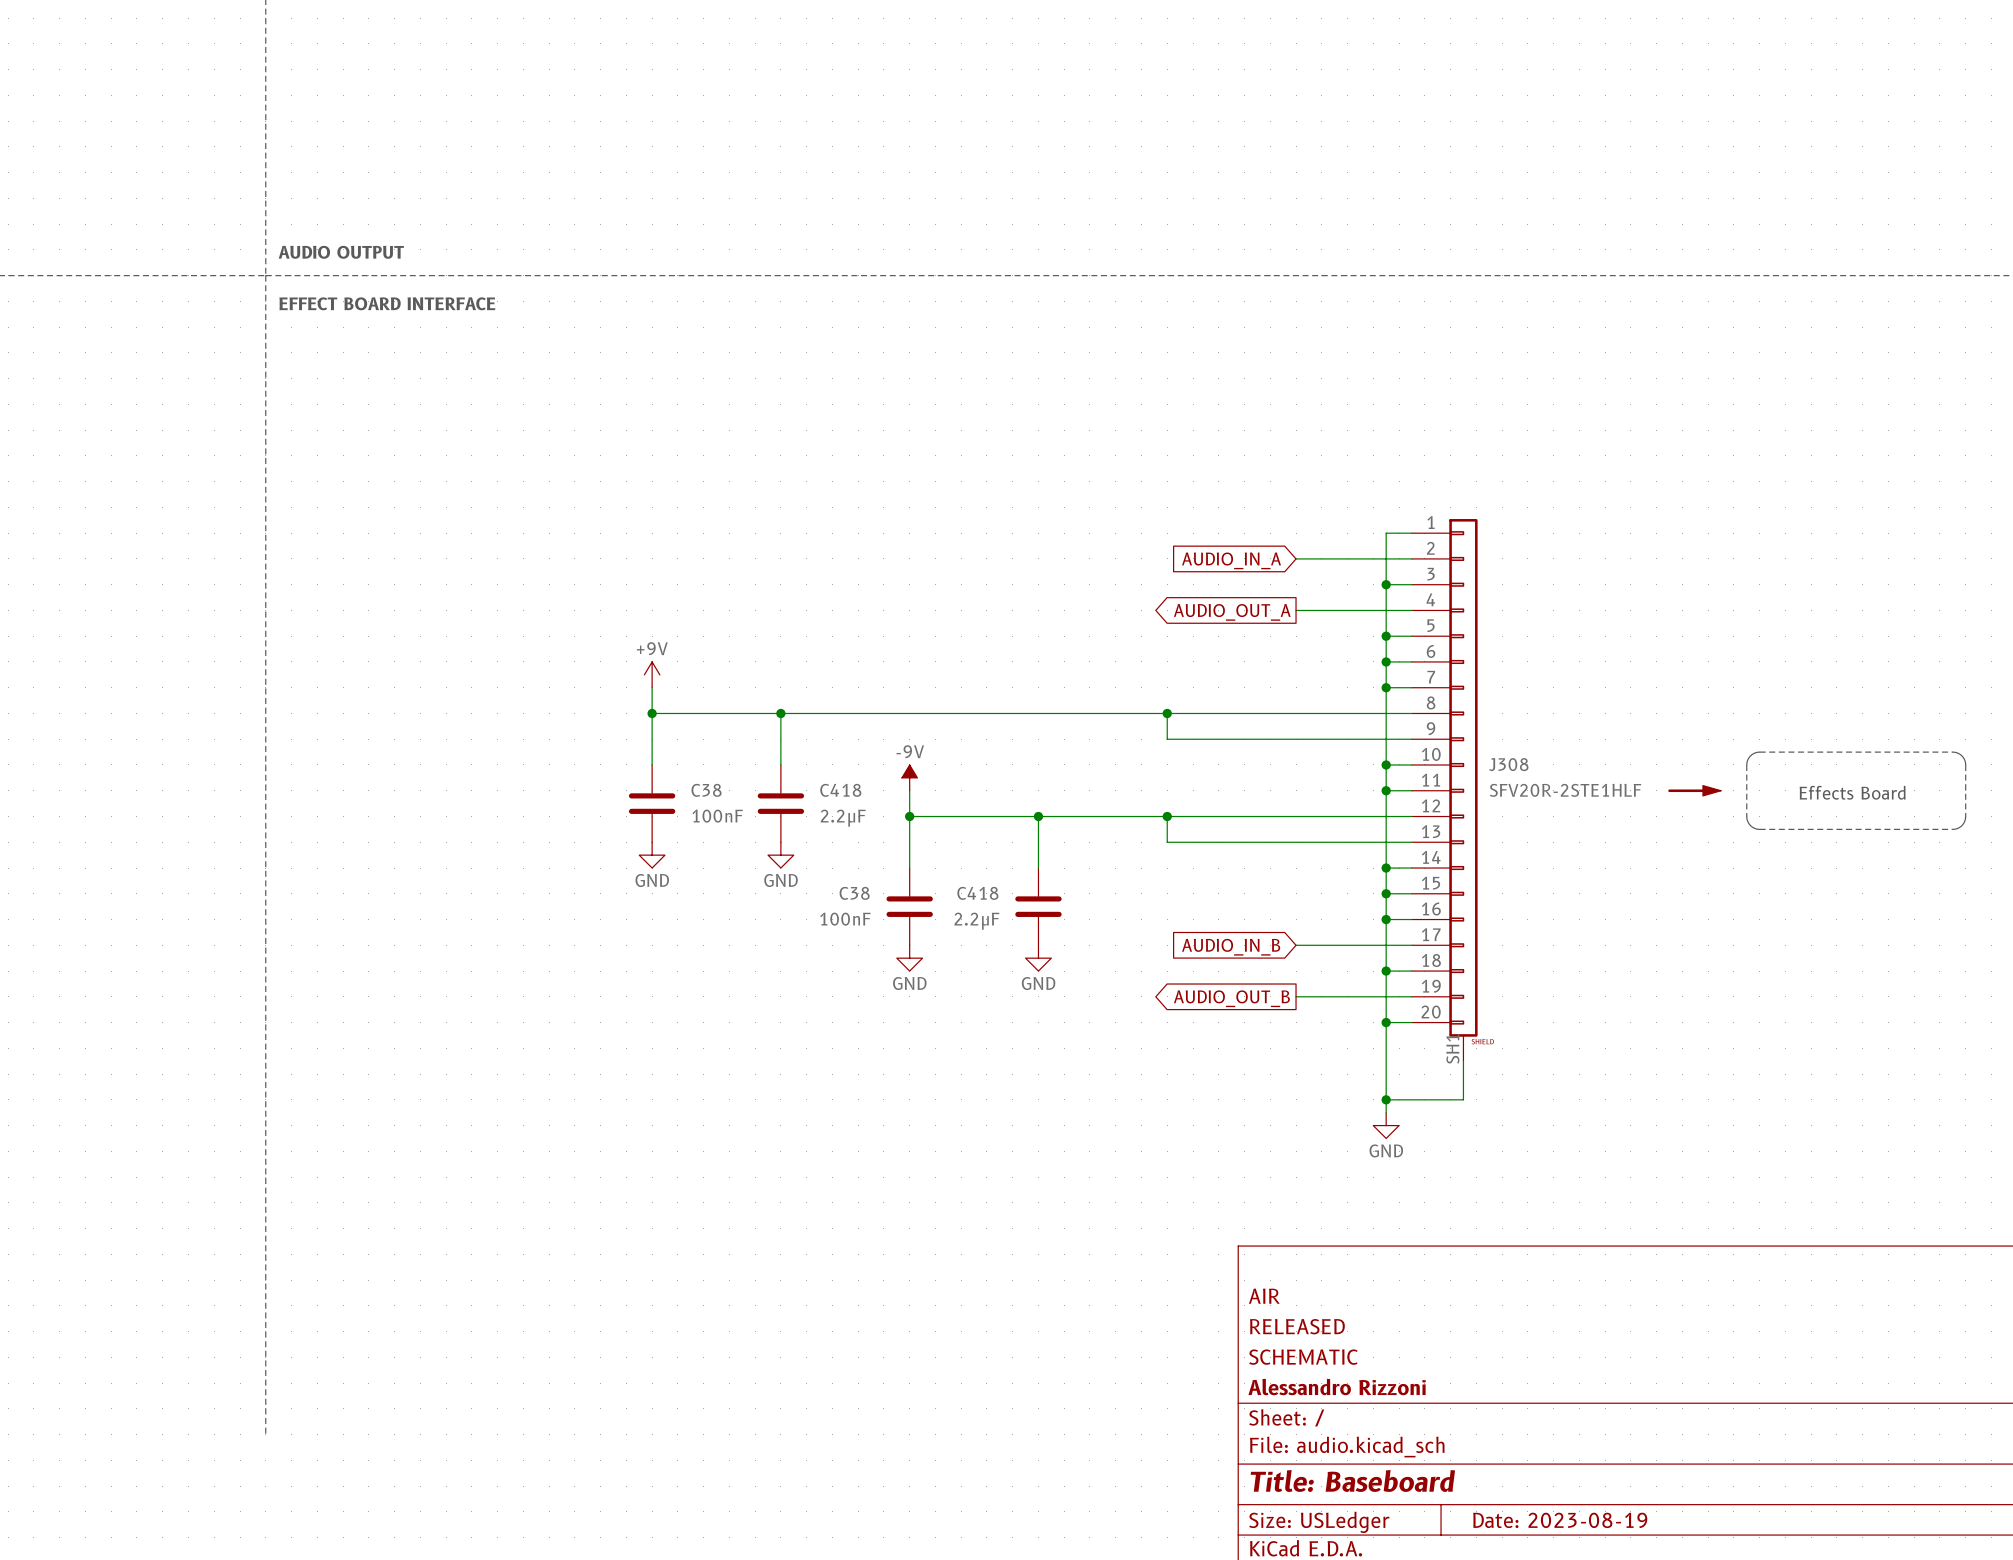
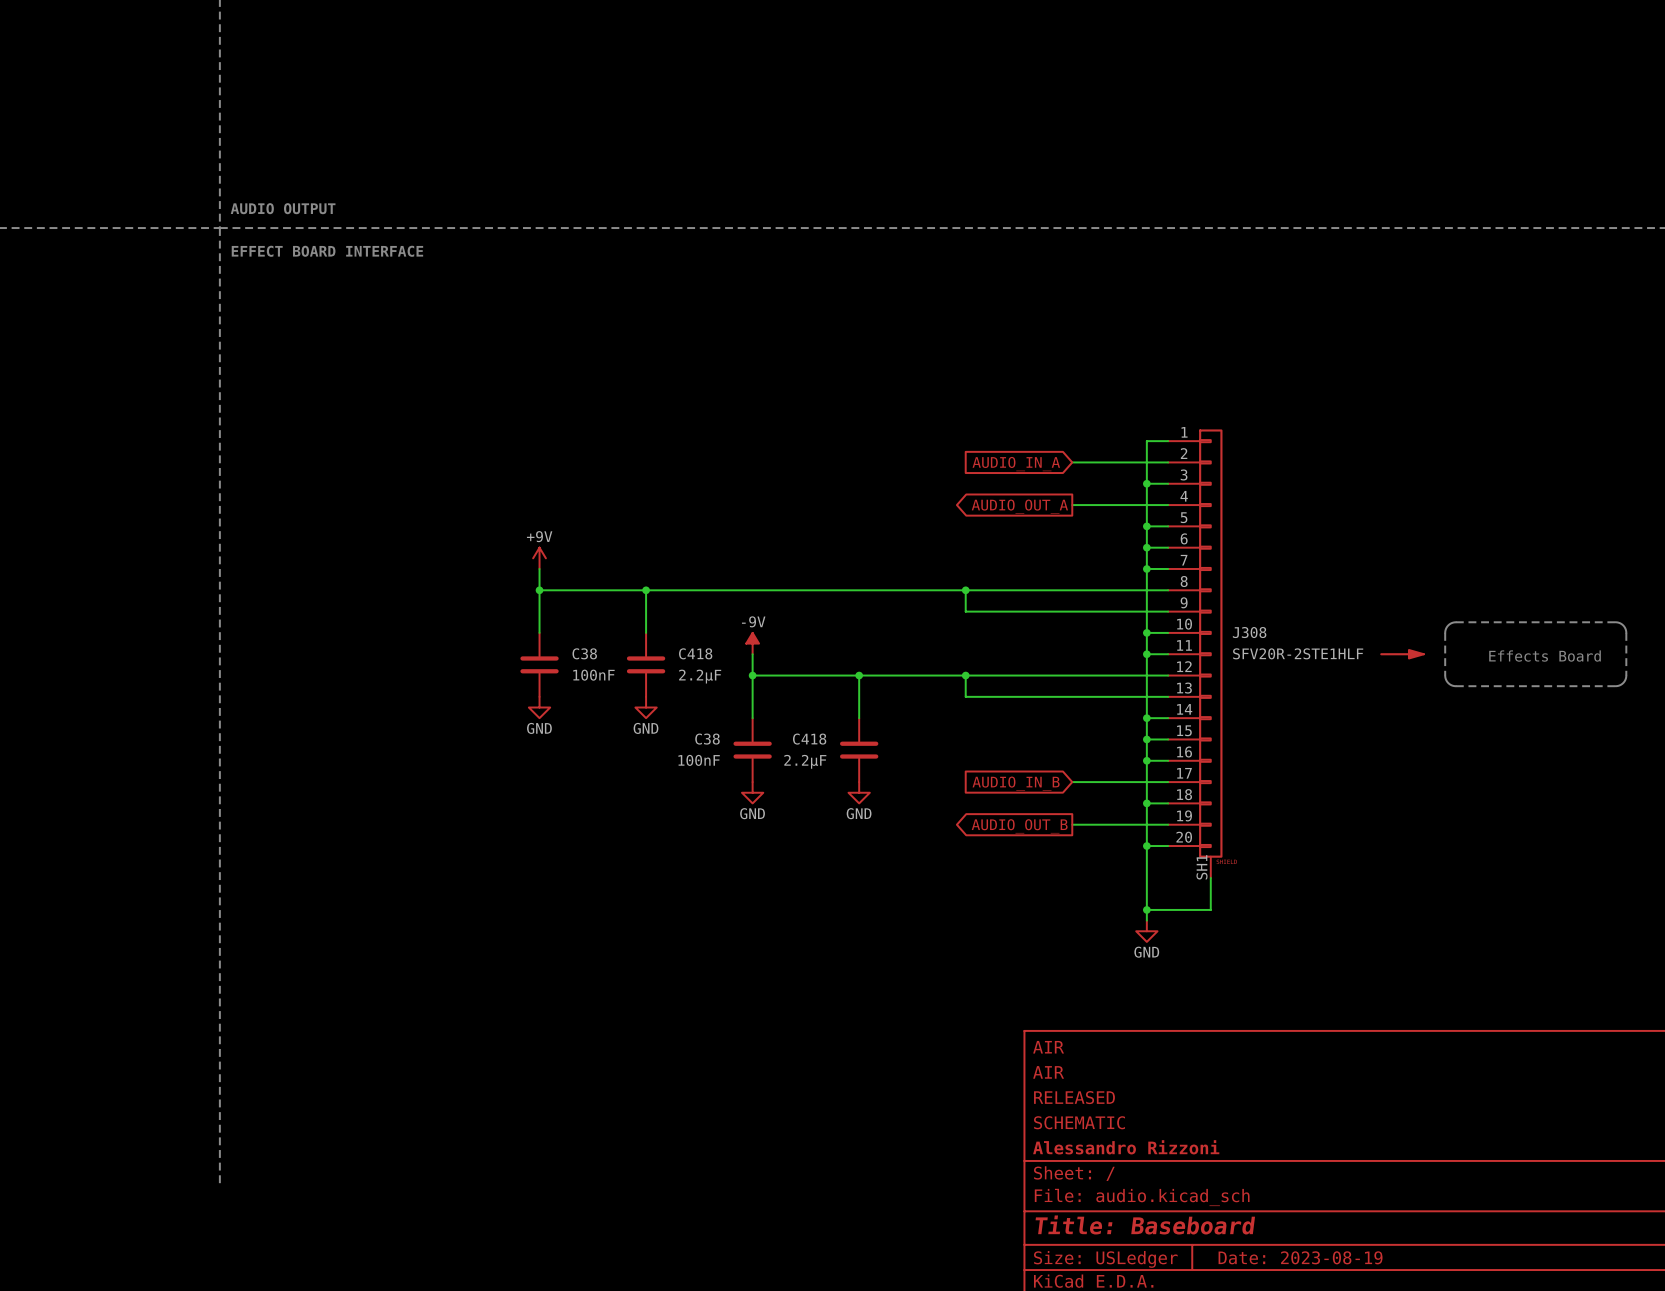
title block: none -> AIR (1048, 1047)

